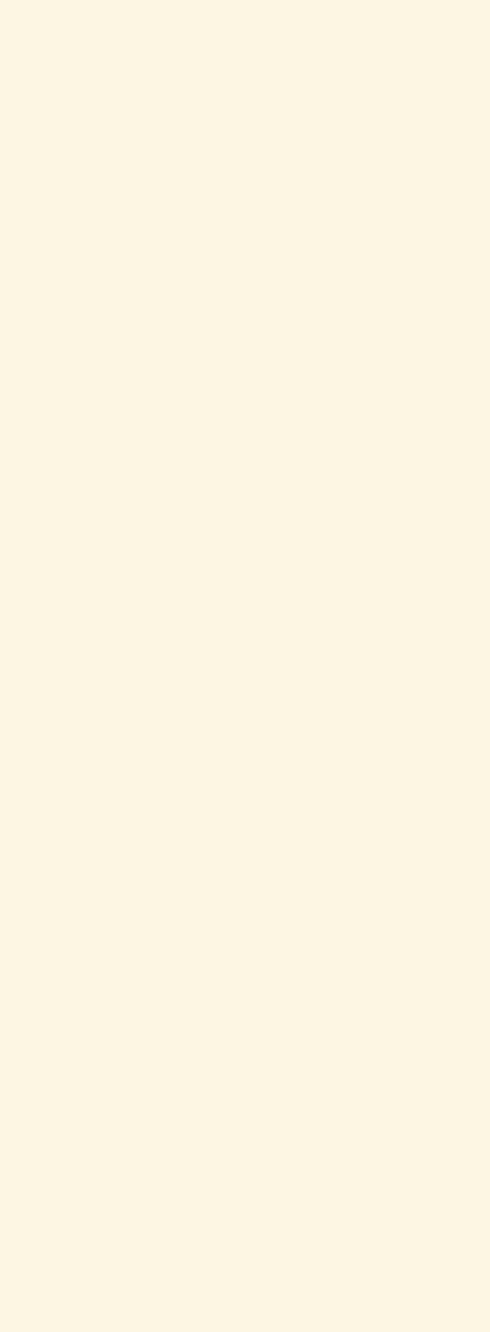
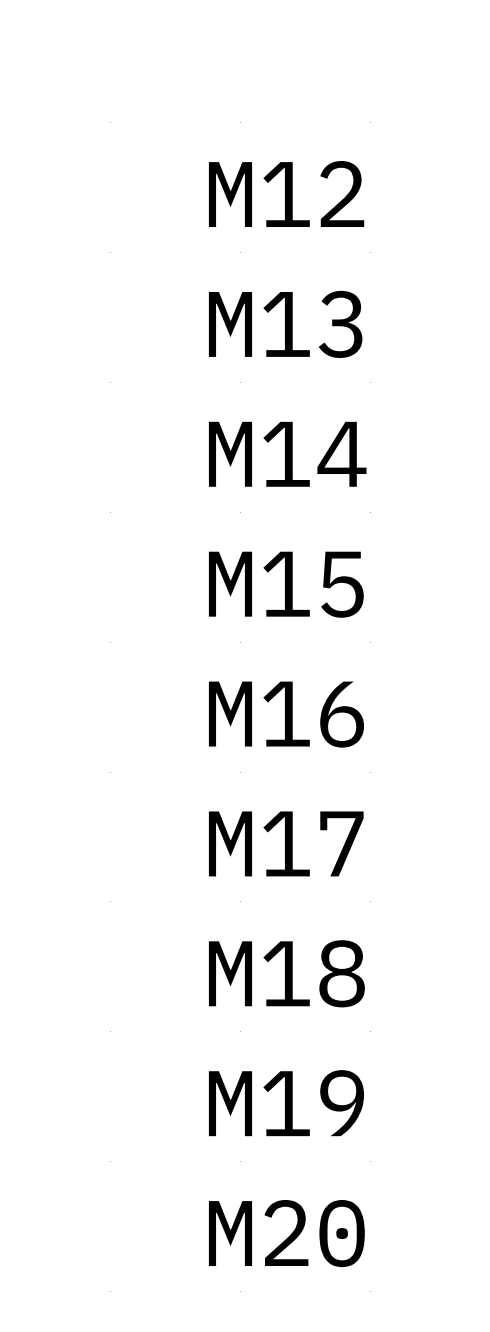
label: none -> M12 (286, 194)
label: none -> M13 (285, 324)
label: none -> M14 (287, 454)
label: none -> M15 (286, 584)
label: none -> M16 (286, 714)
label: none -> M17 (286, 843)
label: none -> M18 (286, 973)
label: none -> M19 (286, 1103)
label: none -> M20 (286, 1233)

